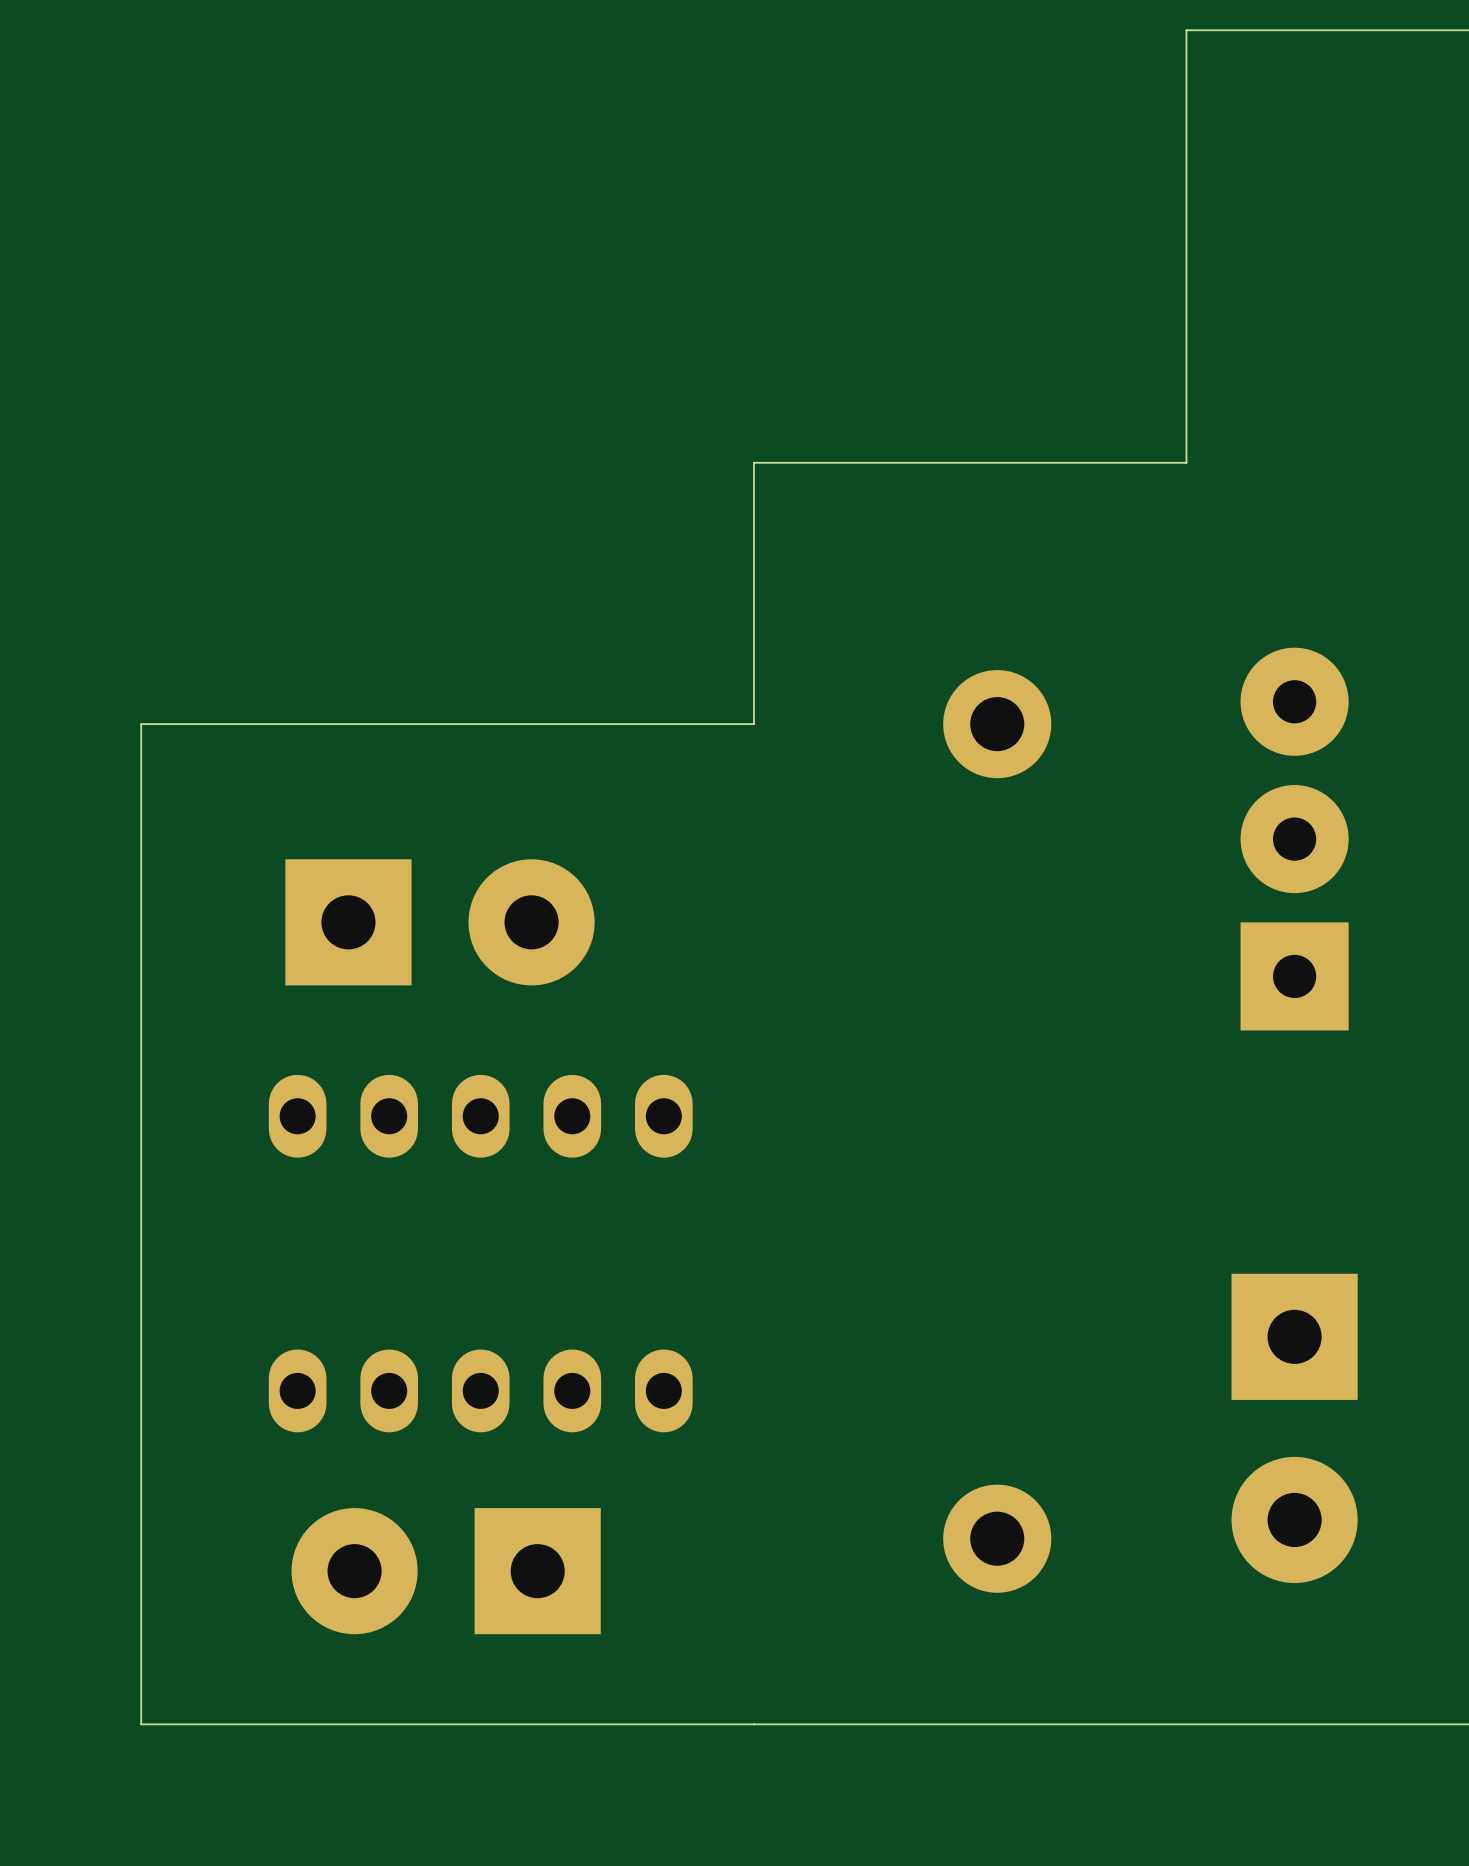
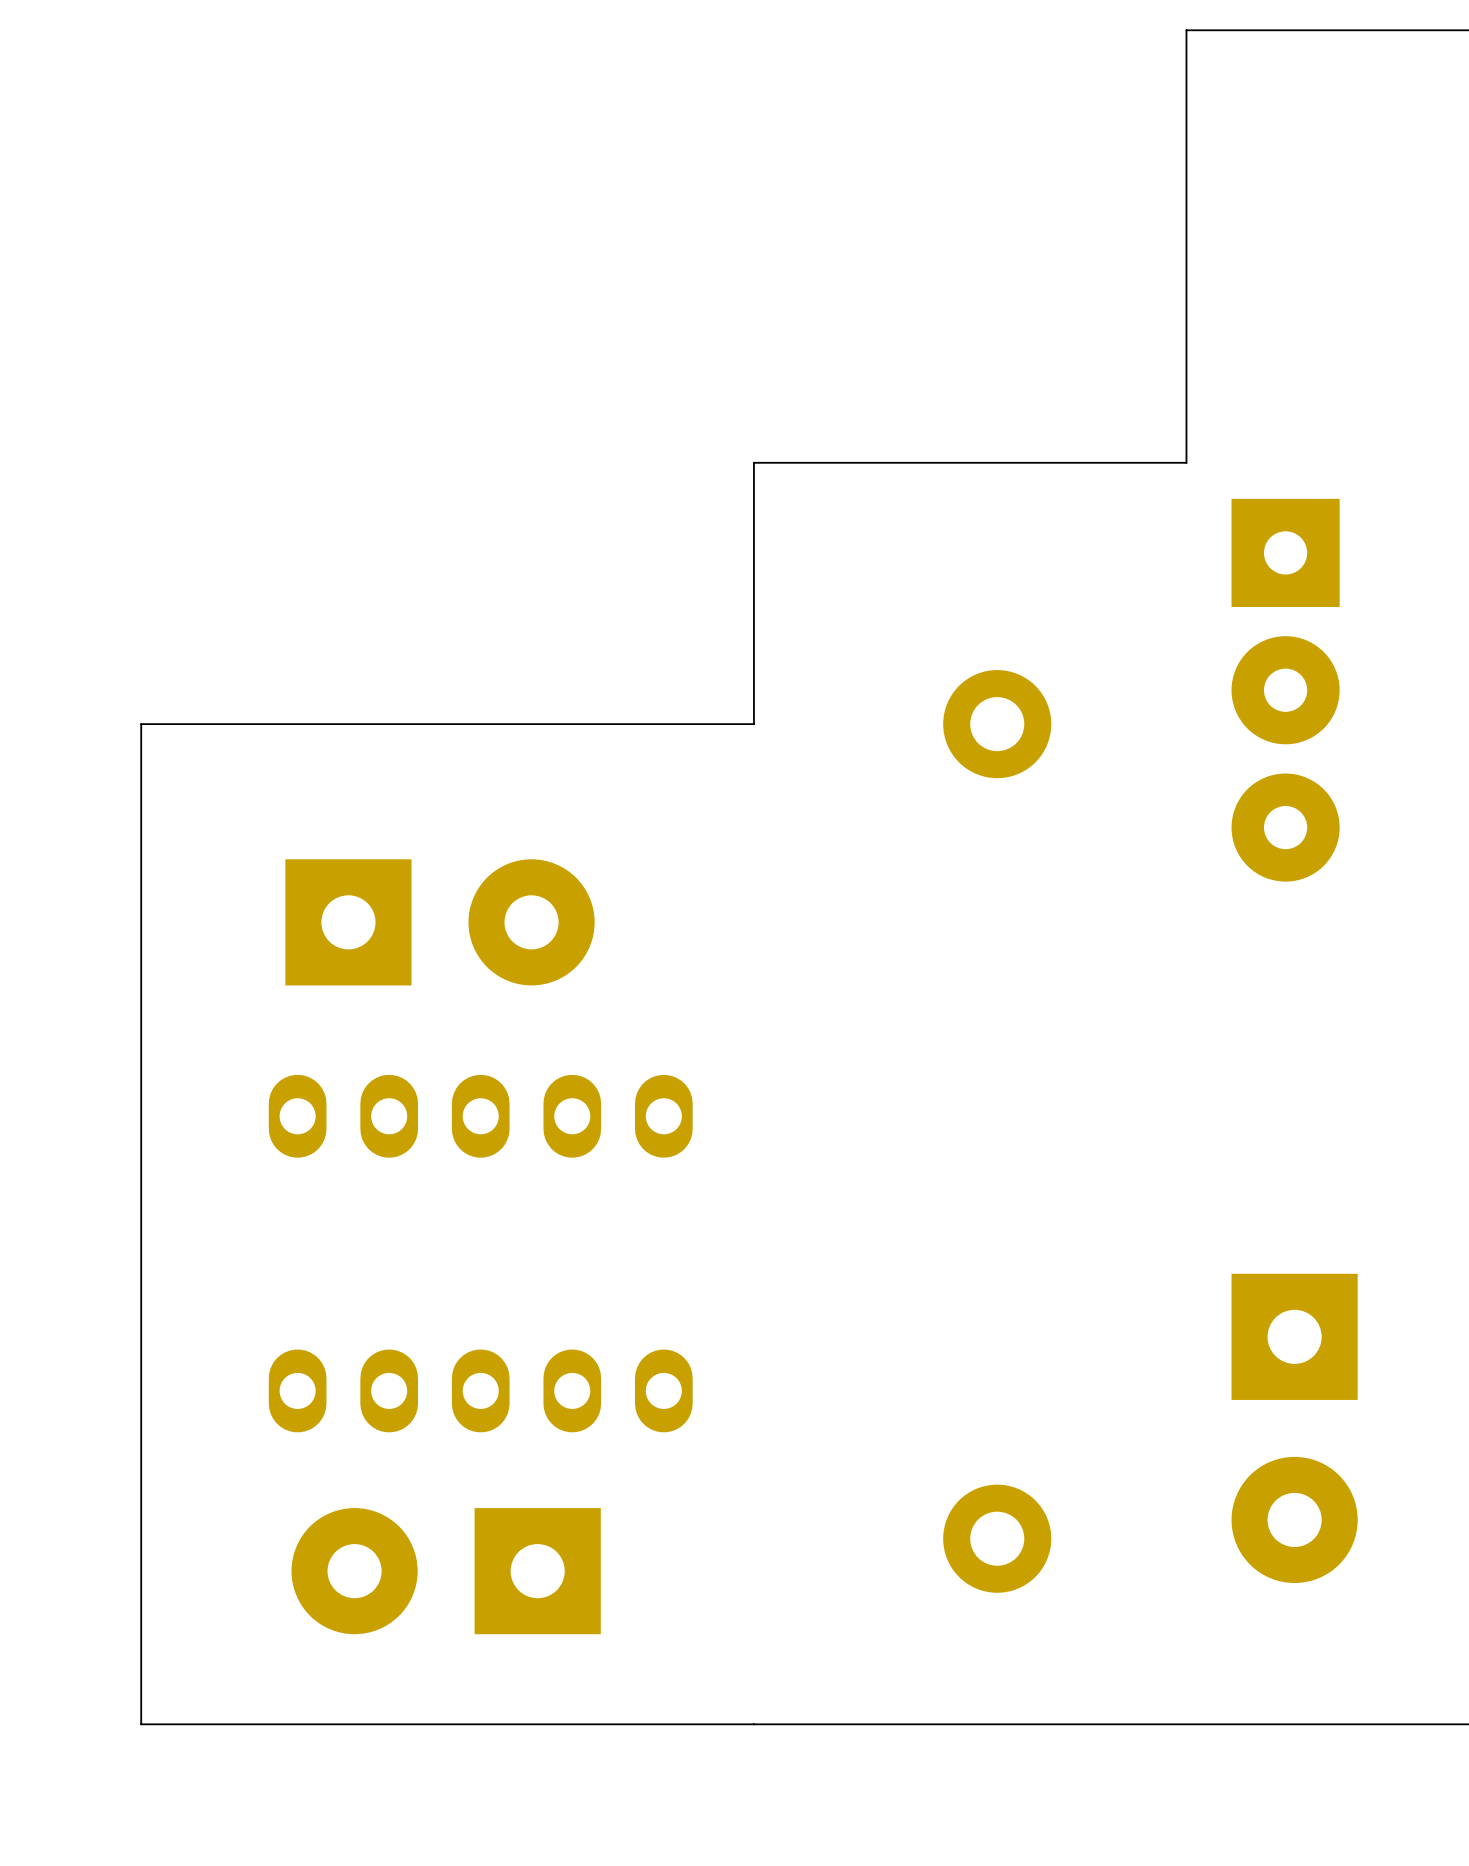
part: none -> (1285, 690)
part: (1294, 839) -> none

